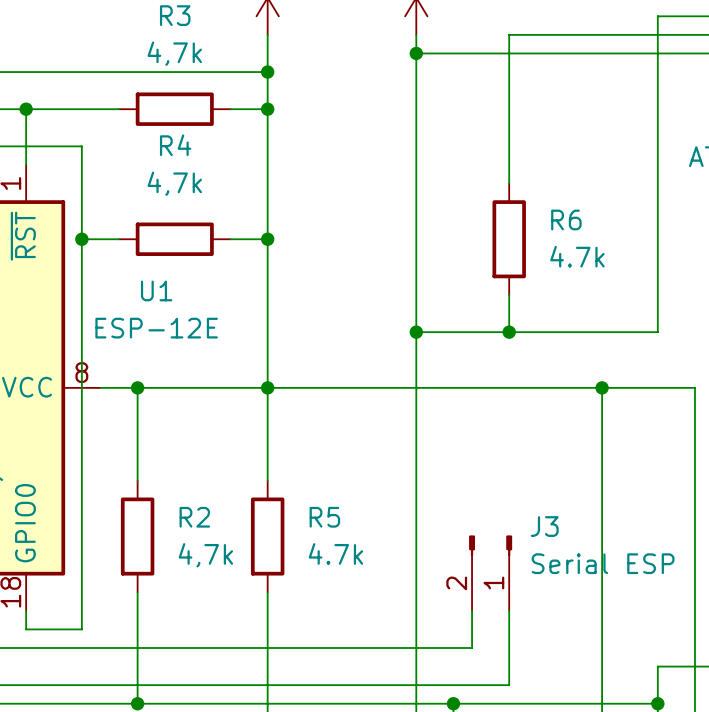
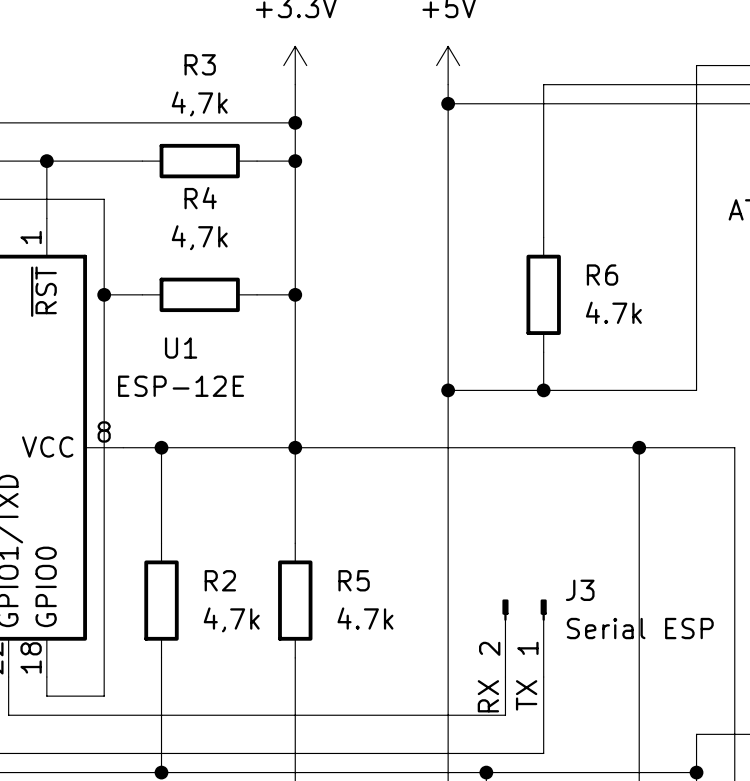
label: none -> TX (526, 695)
label: none -> RX (488, 696)

